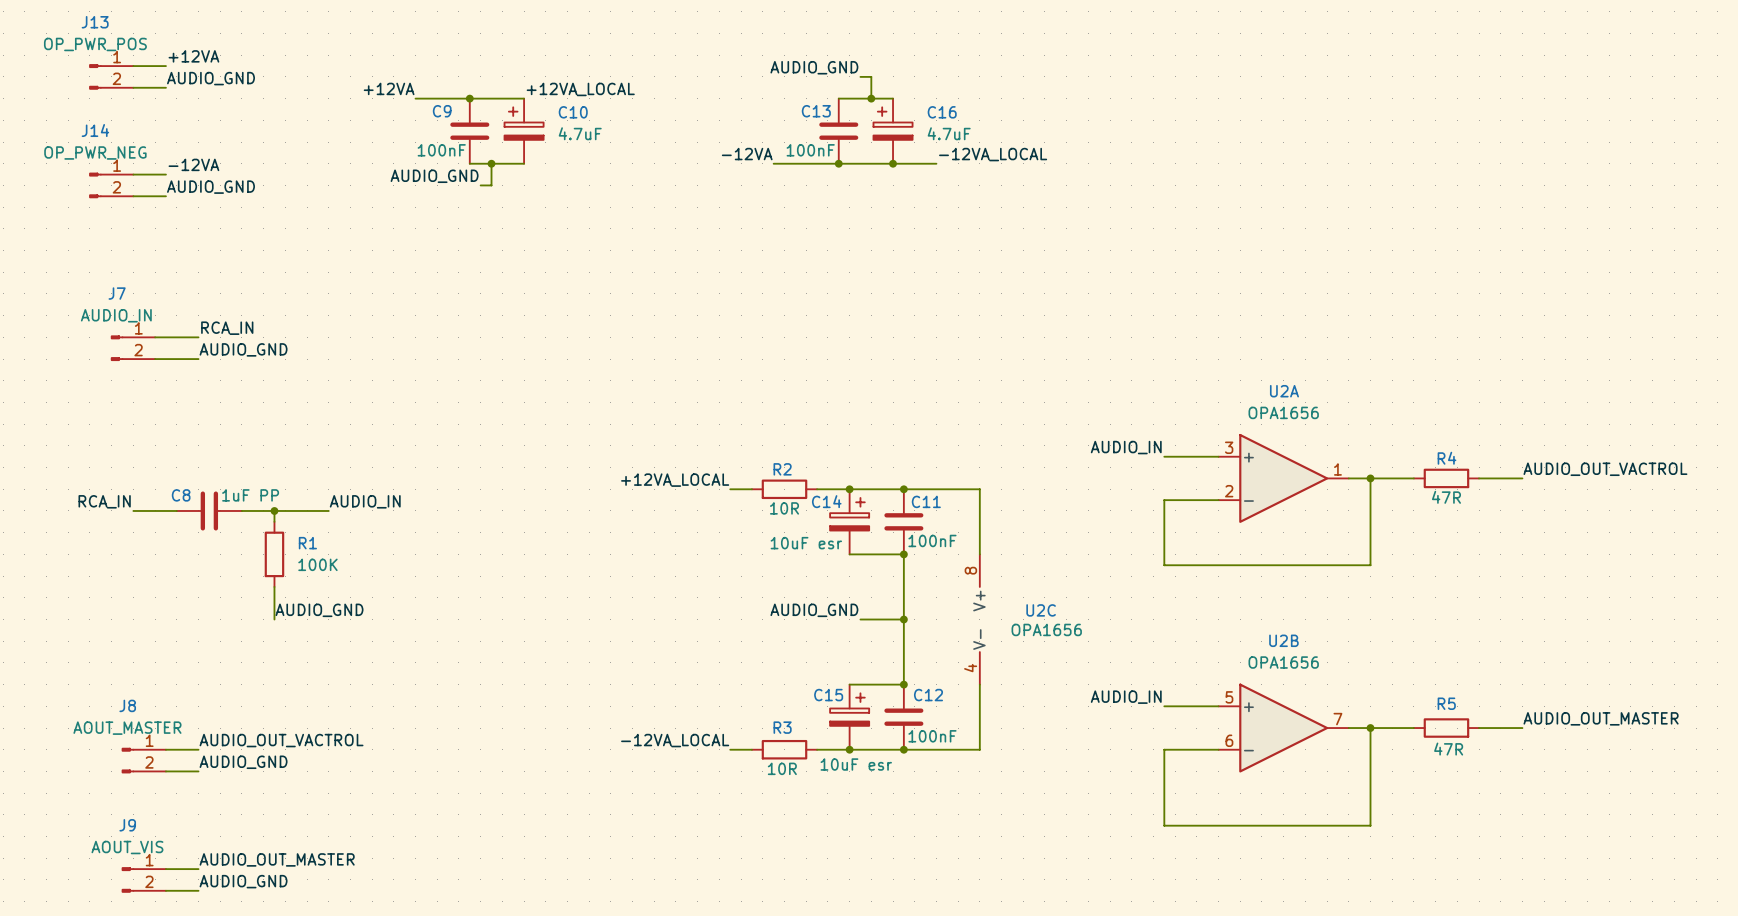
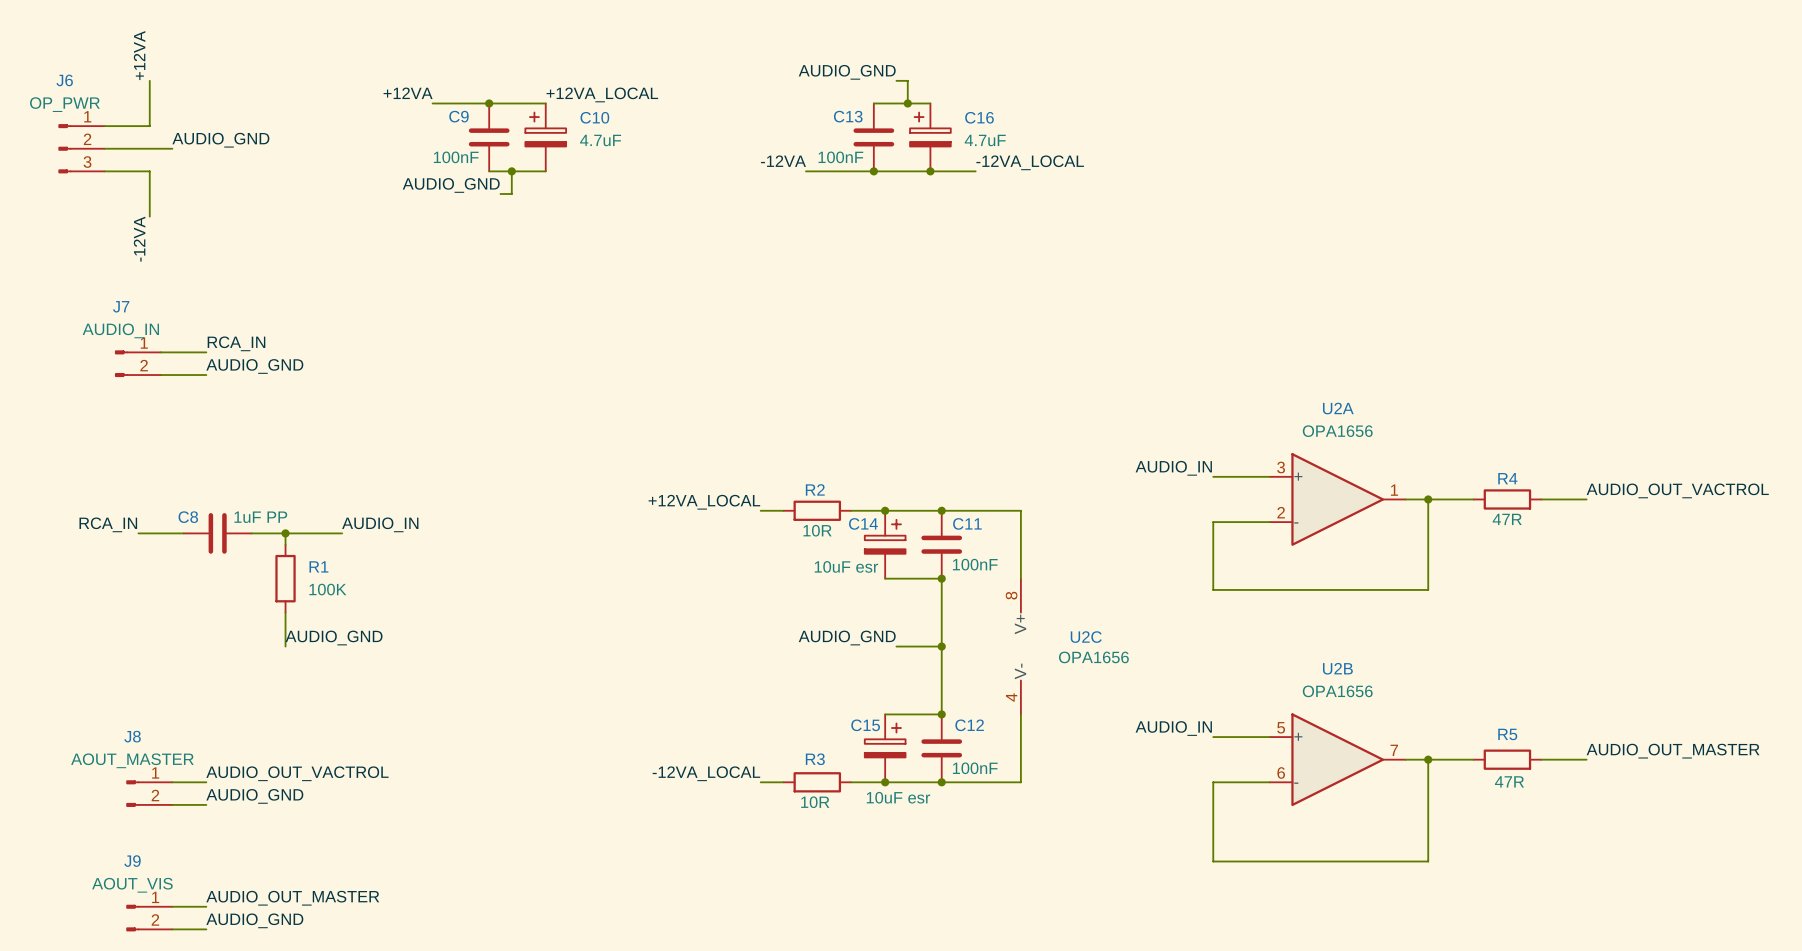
label rotation: 0° (193, 56) -> 90° counterclockwise (139, 55)
label position: +12VA (193, 56) -> +12VA (139, 55)
wire: (133, 66) (165, 66) -> none
J13: OP_PWR_POS (111, 76) -> none
wire: none -> (149, 80) (149, 126) (104, 126)
label: AUDIO_GND (210, 78) -> none
wire: (133, 87) (165, 87) -> none
label: none -> AUDIO_GND (220, 140)
J6: none -> OP_PWR (81, 148)
wire: none -> (104, 148) (172, 148)
wire: none -> (104, 171) (149, 171) (149, 216)
label rotation: 0° (193, 164) -> 90° counterclockwise (139, 239)
label position: -12VA (193, 164) -> -12VA (139, 239)
wire: (133, 174) (165, 174) -> none
J14: OP_PWR_NEG (111, 185) -> none
label: AUDIO_GND (210, 187) -> none
wire: (133, 196) (165, 196) -> none

